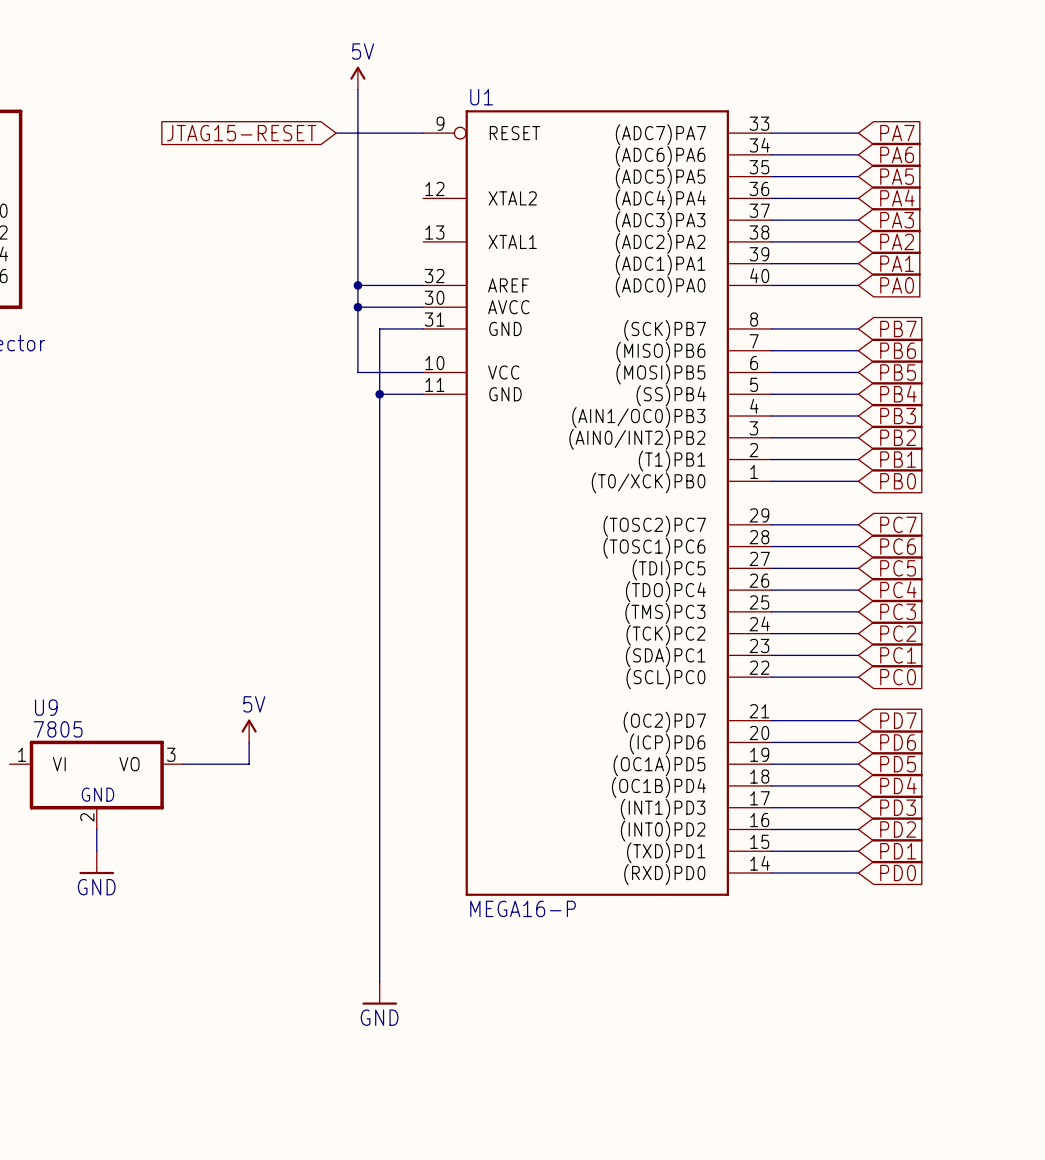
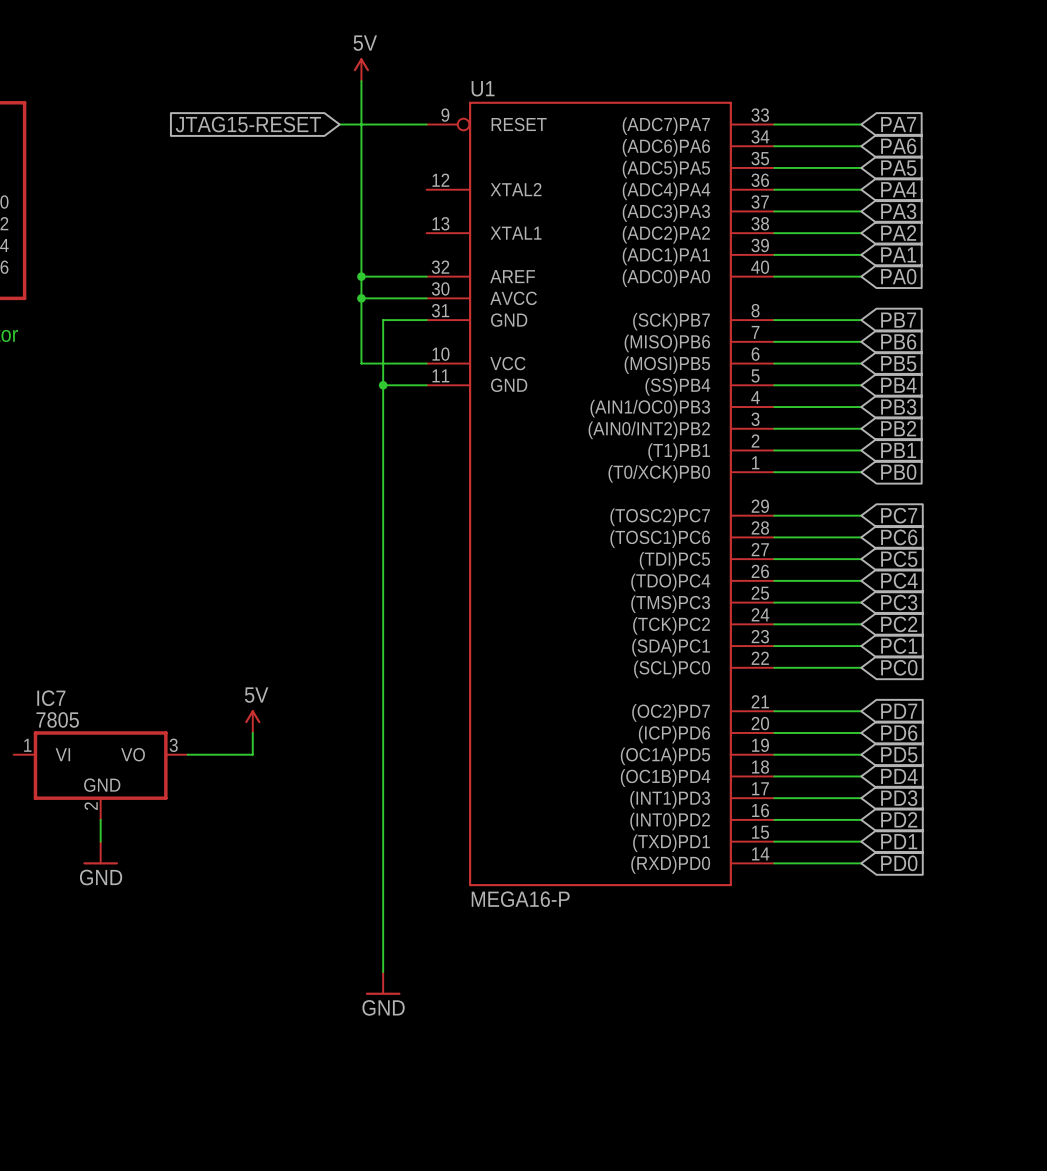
U9 name: U9 (46, 707) -> IC7 (51, 698)

